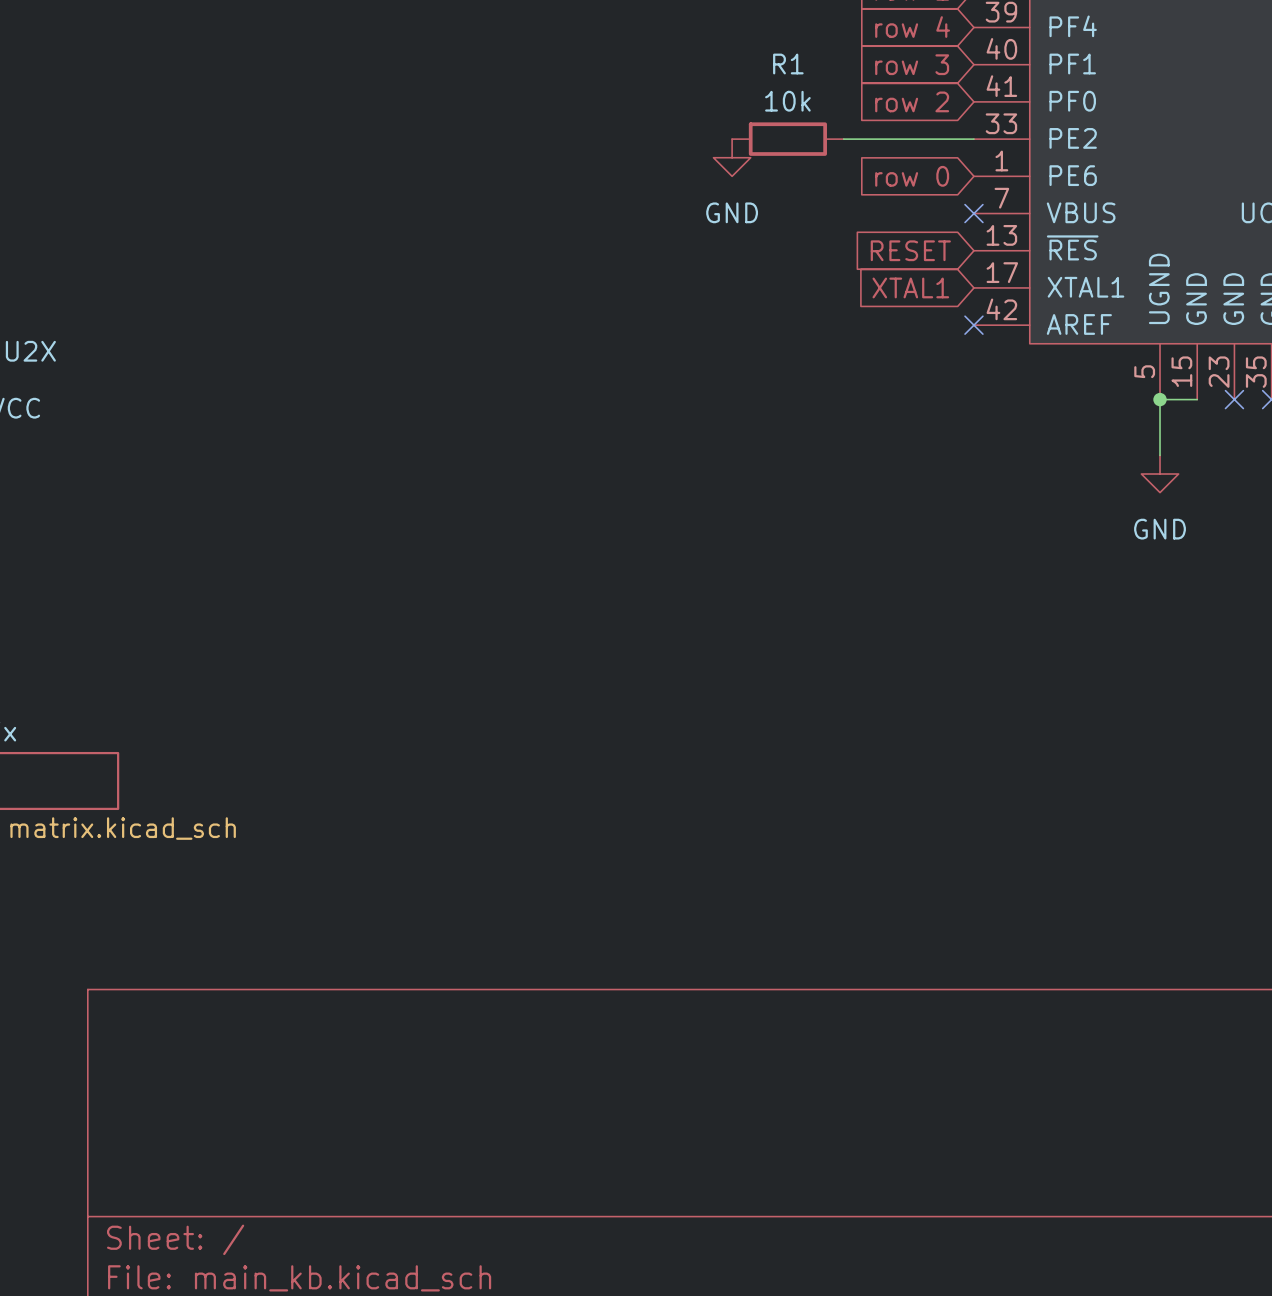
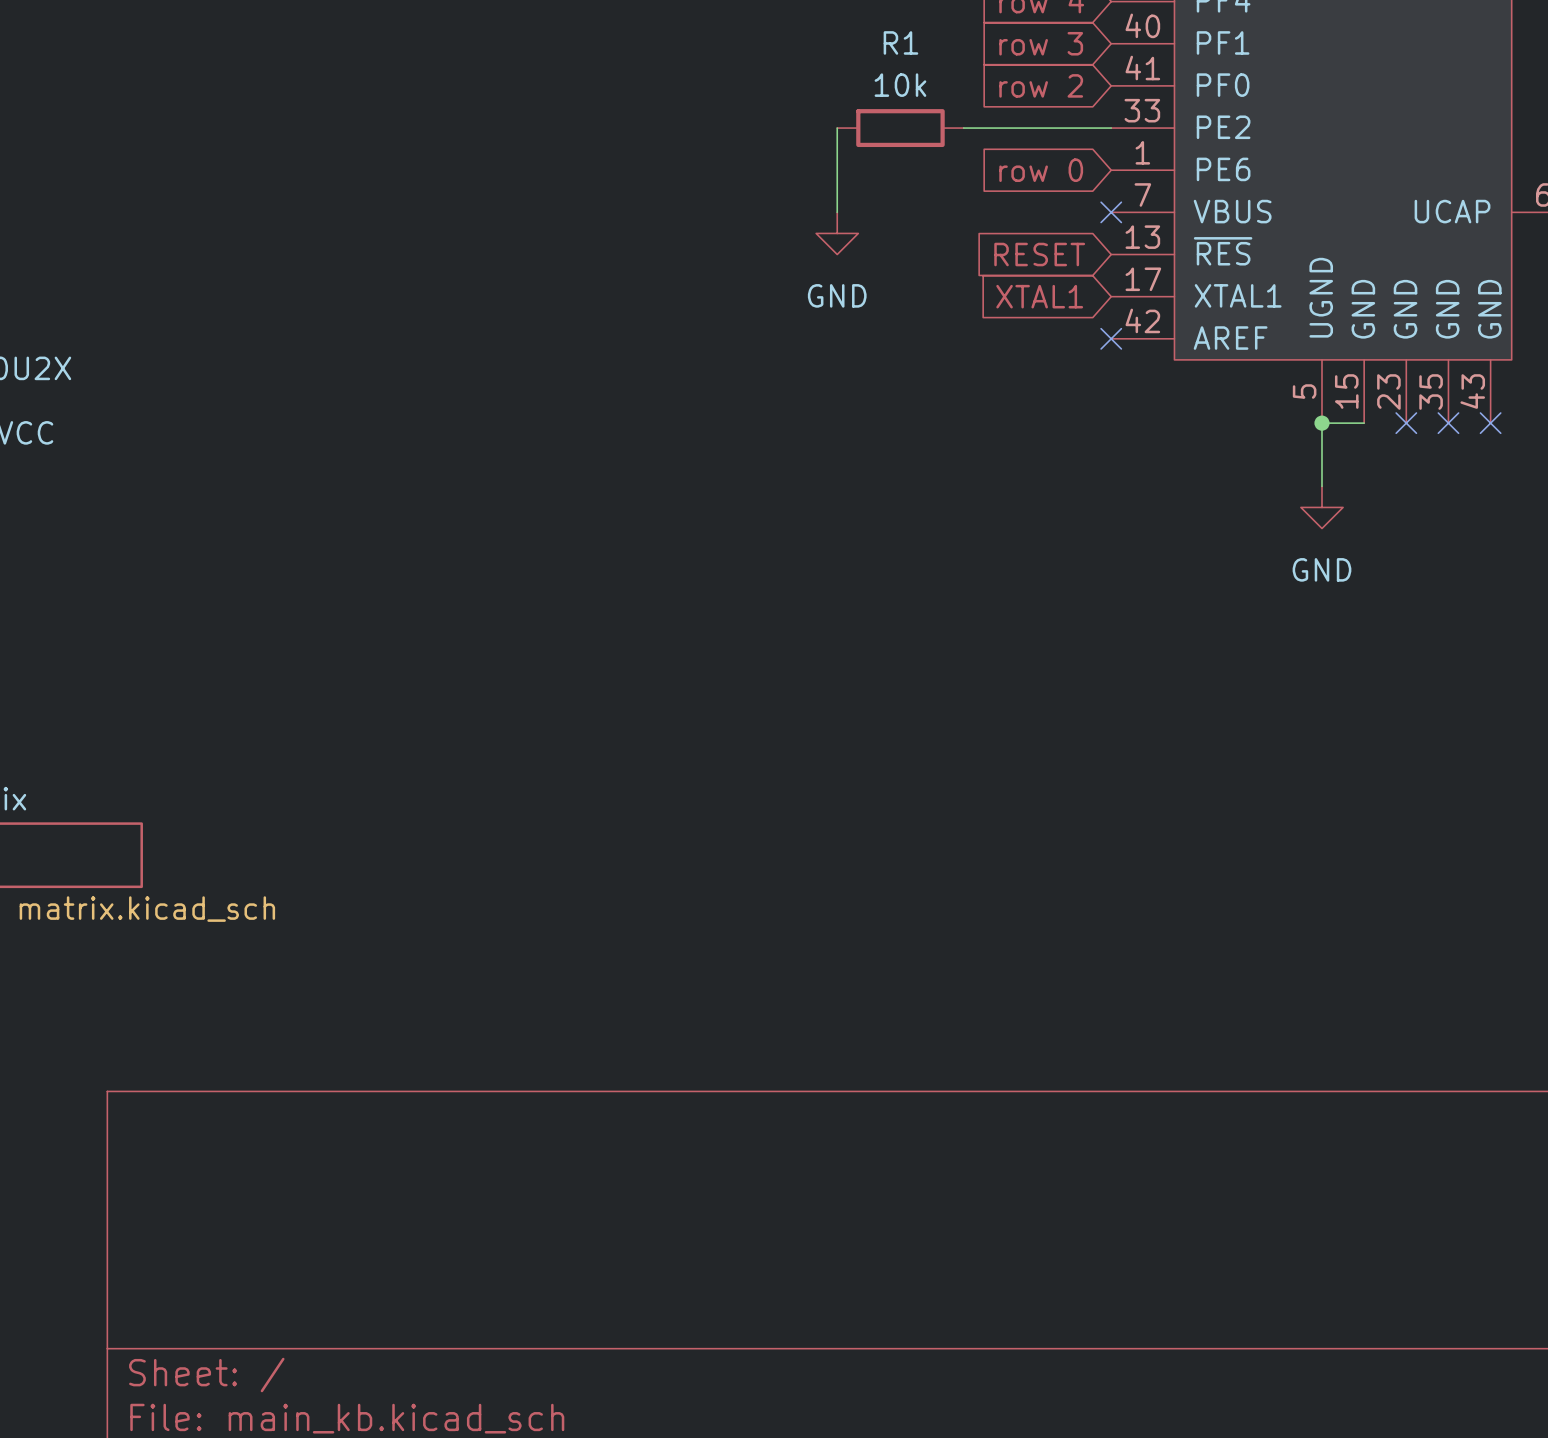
wire: none -> (837, 128) (837, 212)
power symbol position: GND (732, 157) -> GND (837, 233)

